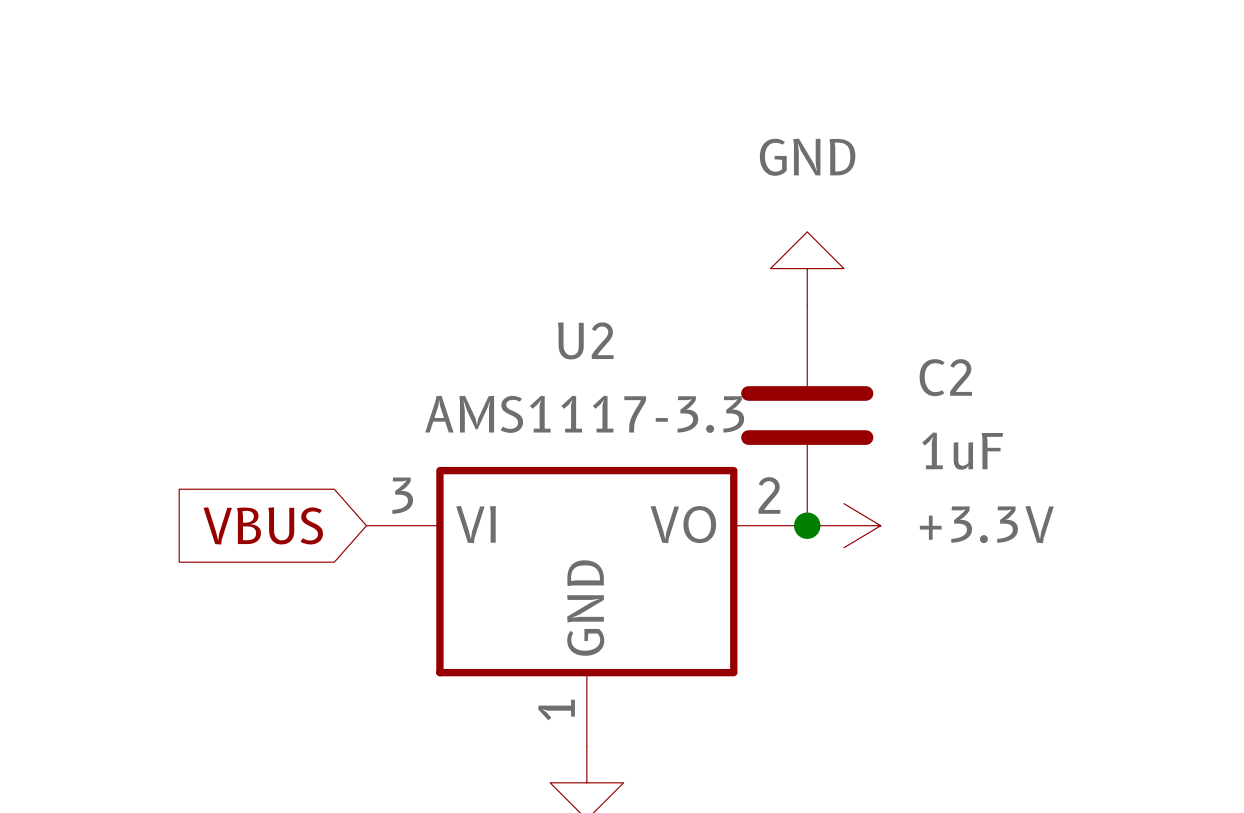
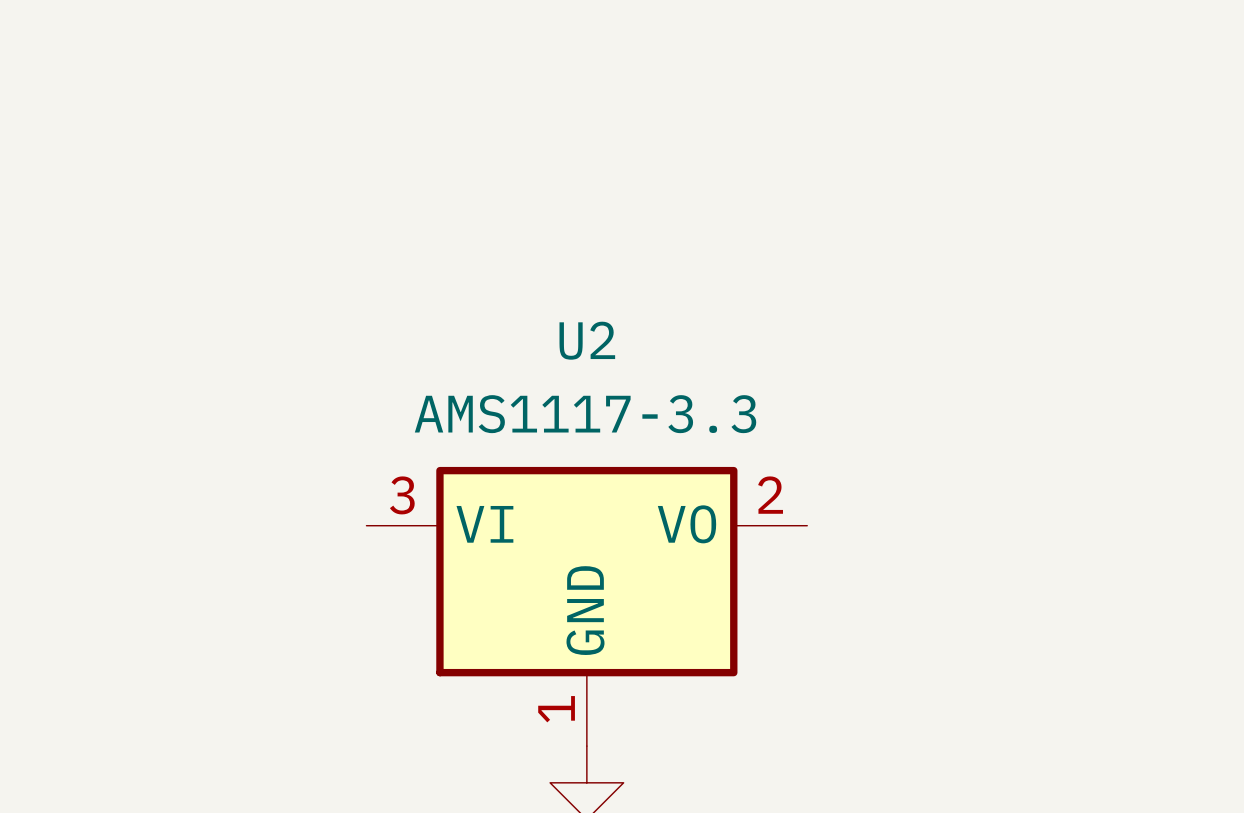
power symbol: GND (807, 268) -> none
C2: 1uF (807, 415) -> none
global label: VBUS (263, 525) -> none
junction: (807, 525) -> none
power symbol: +3.3V (843, 525) -> none

